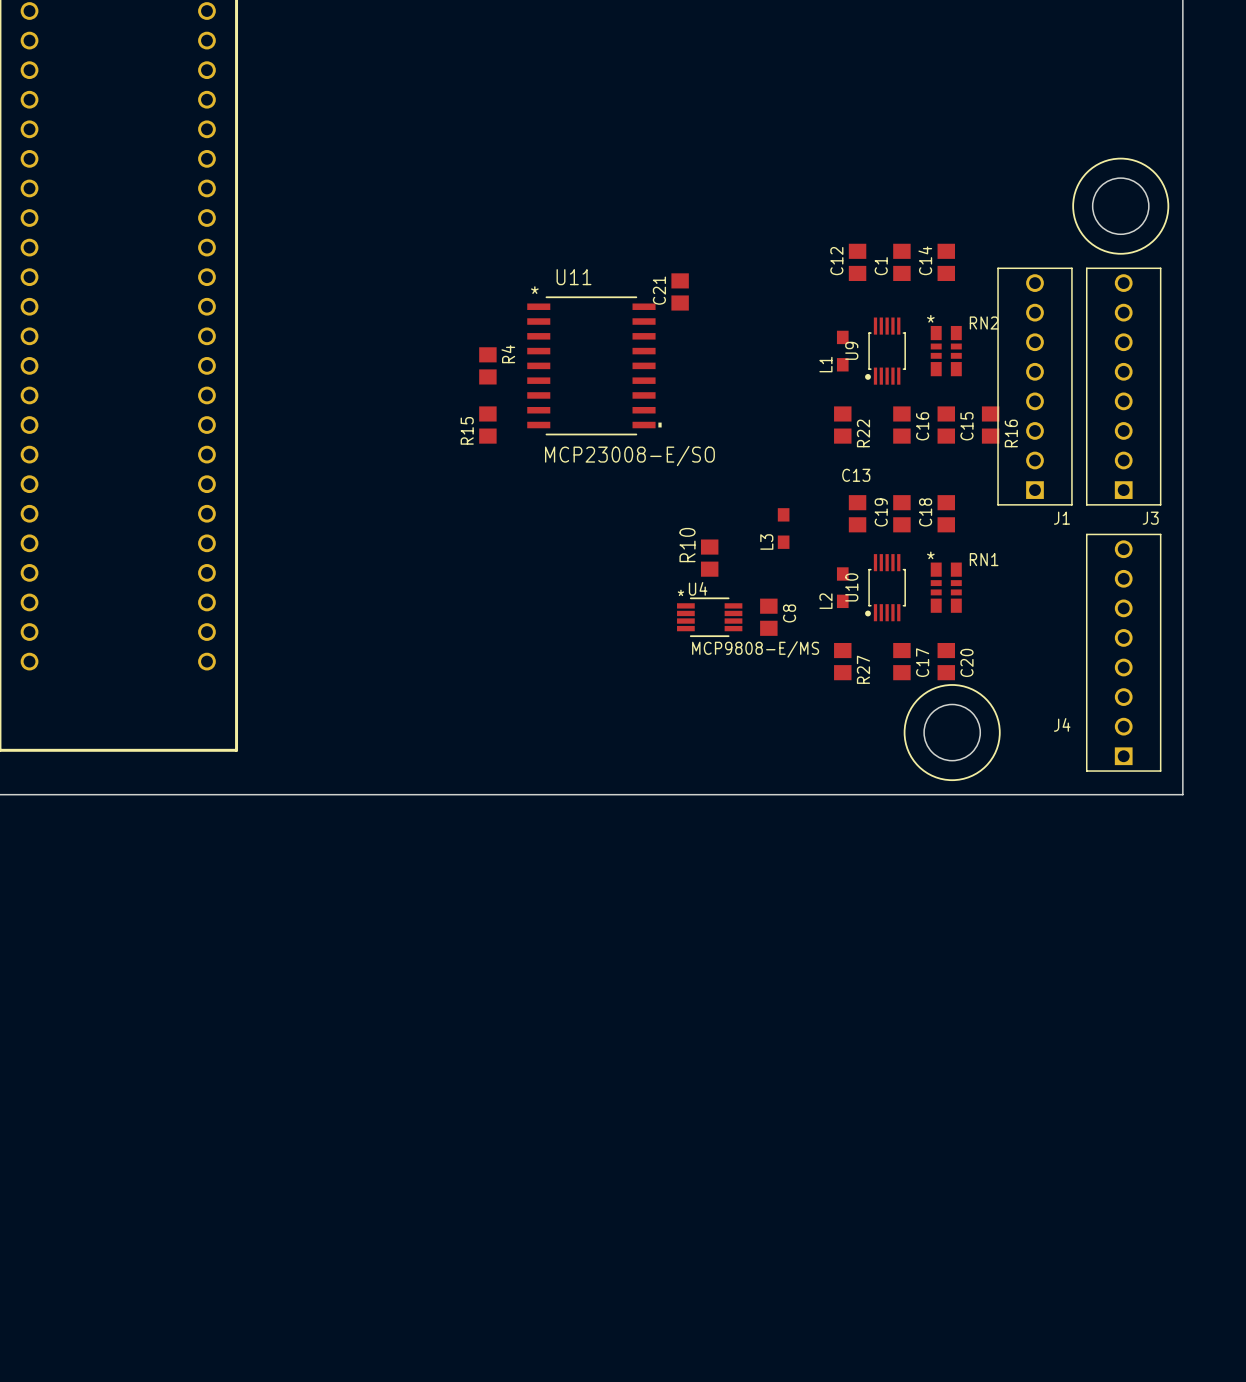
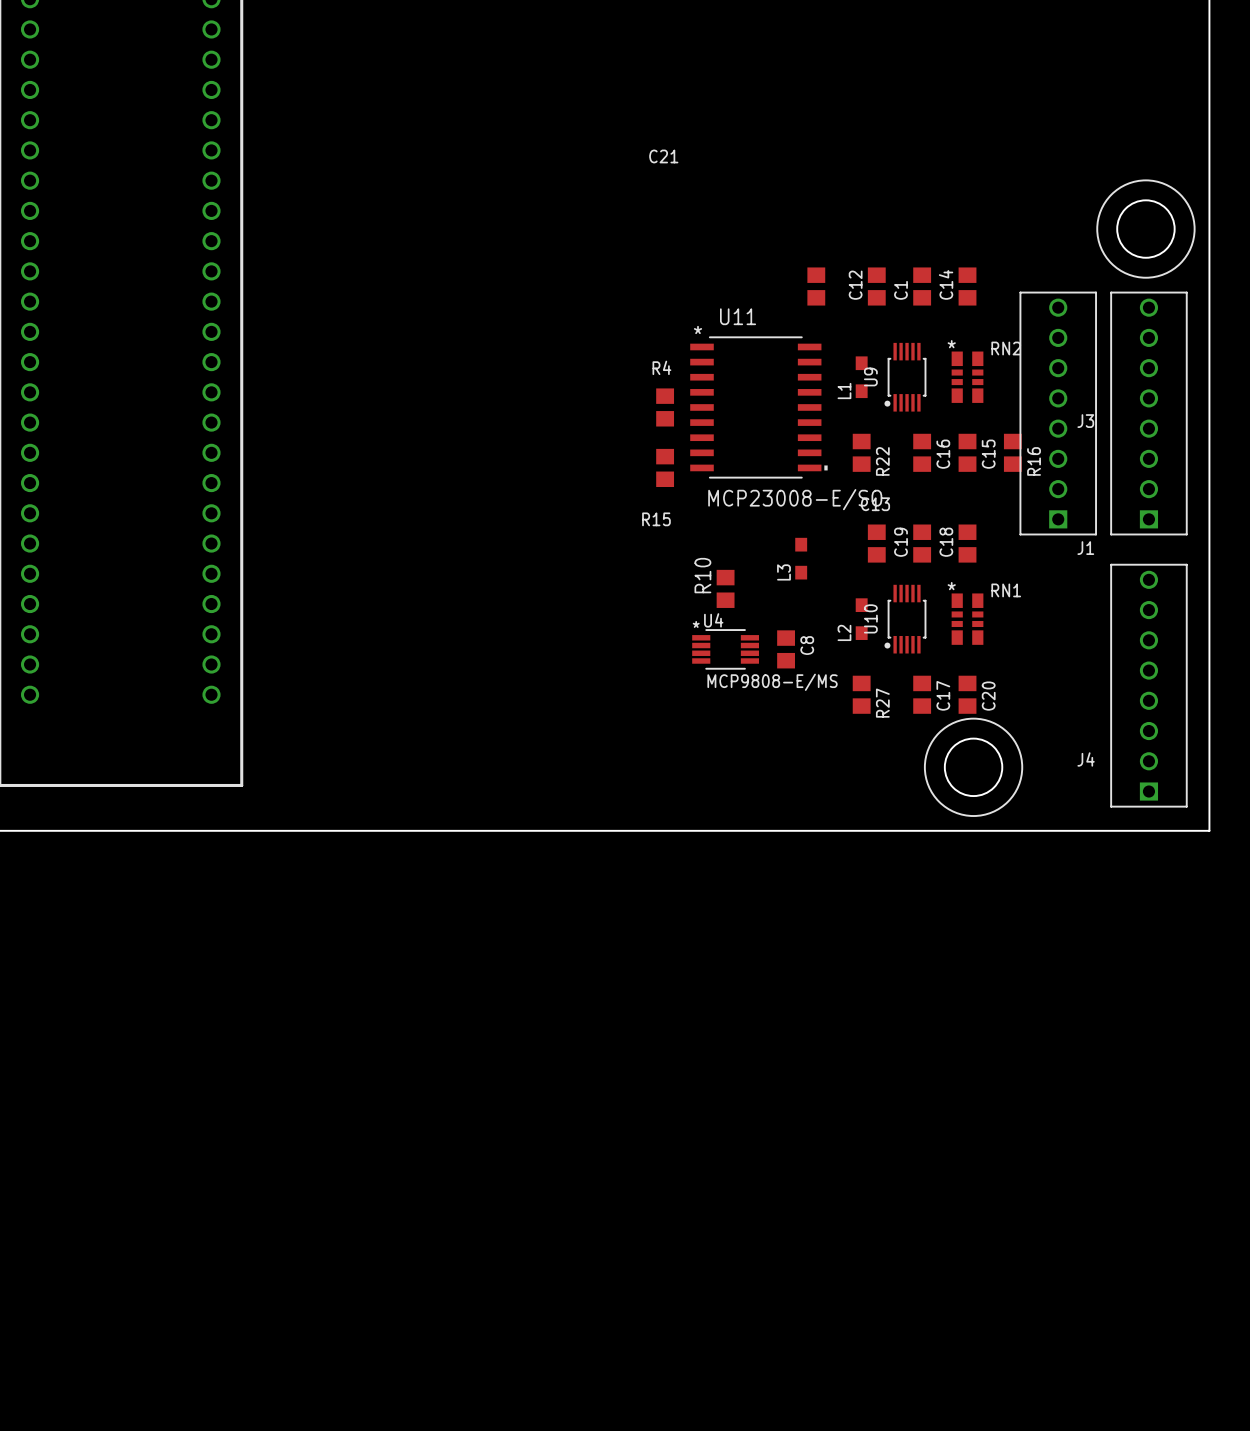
C21 name rotation: 0° (659, 290) -> 90° clockwise (663, 156)
C21 name position: C21 (659, 290) -> C21 (663, 156)
C21 position: (680, 291) -> (816, 286)
R4 name rotation: 0° (508, 354) -> 90° clockwise (661, 367)
R4 name position: R4 (508, 354) -> R4 (661, 367)
R4 position: (487, 365) -> (665, 407)
U11 position: (594, 365) -> (758, 407)
R15 position: (487, 425) -> (665, 467)
R15 name rotation: 0° (467, 430) -> 90° clockwise (656, 519)
R15 name position: R15 (467, 430) -> R15 (656, 519)
J3 name position: J3 (1150, 518) -> J3 (1085, 421)

